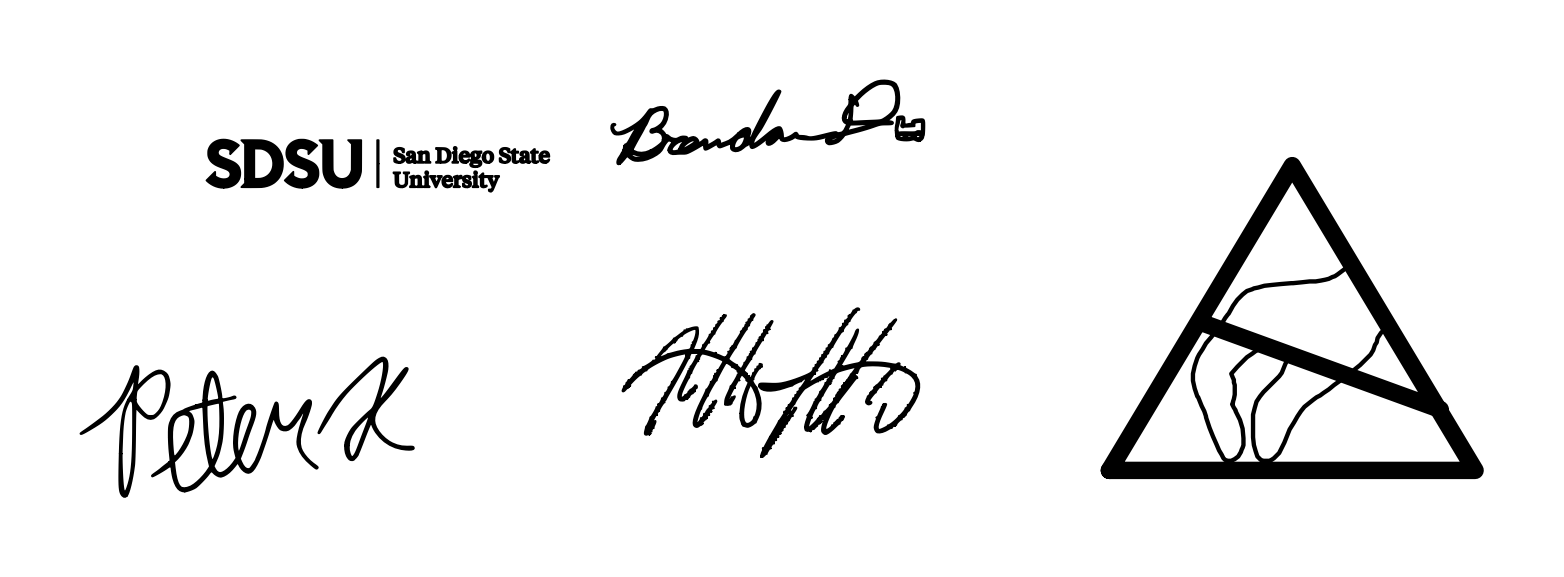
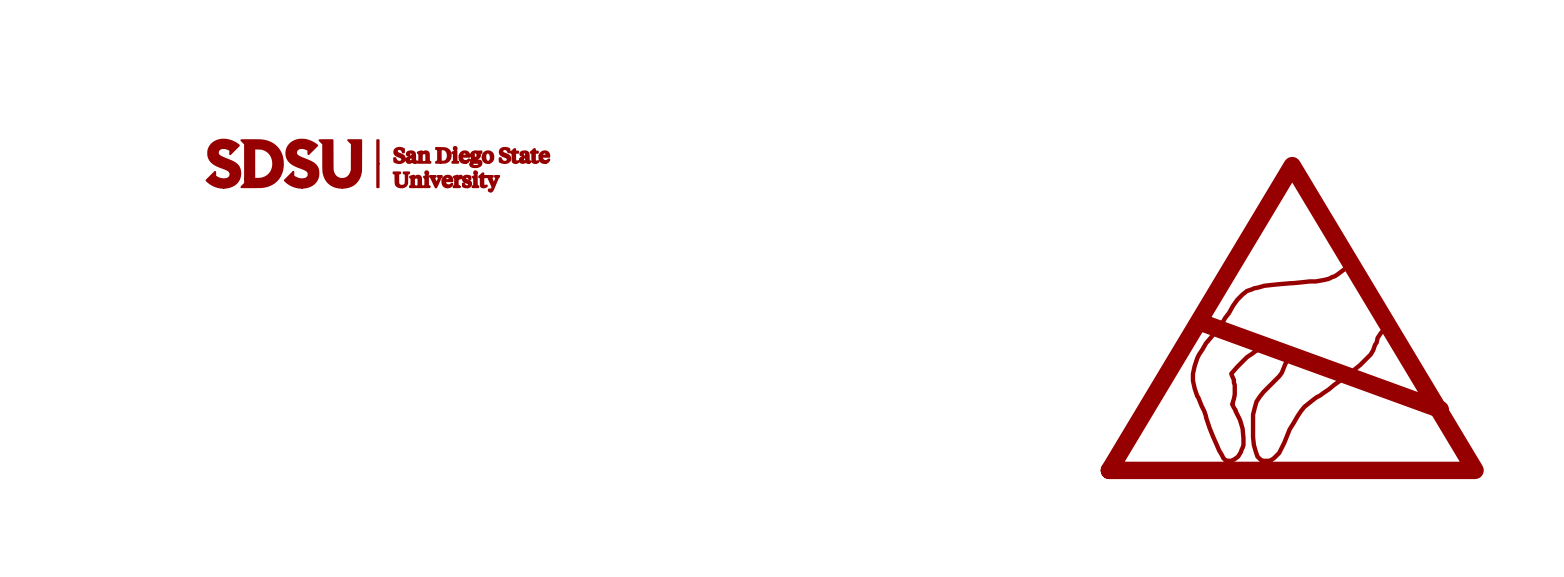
power symbol: (767, 122) -> none
power symbol: (770, 382) -> none
power symbol: (247, 427) -> none

